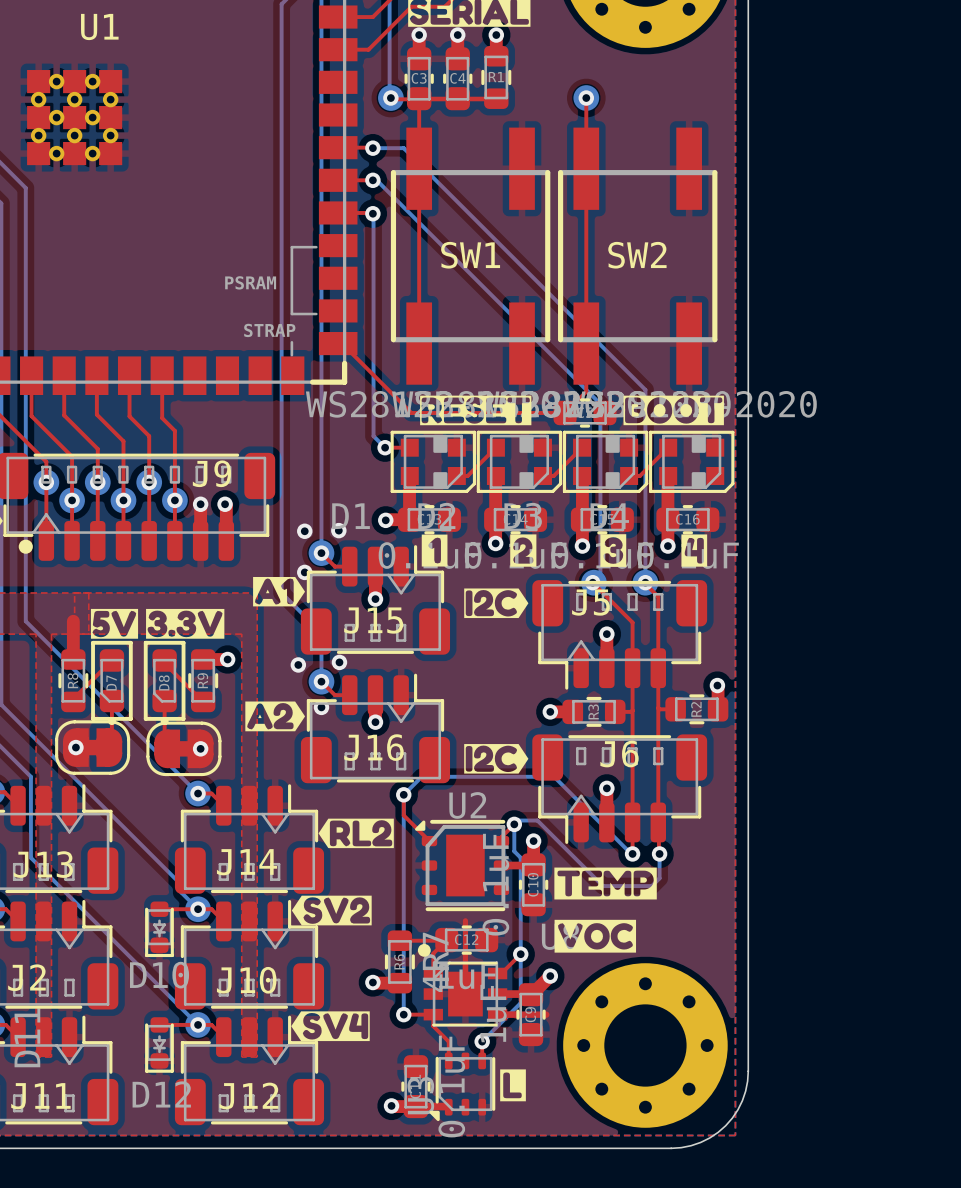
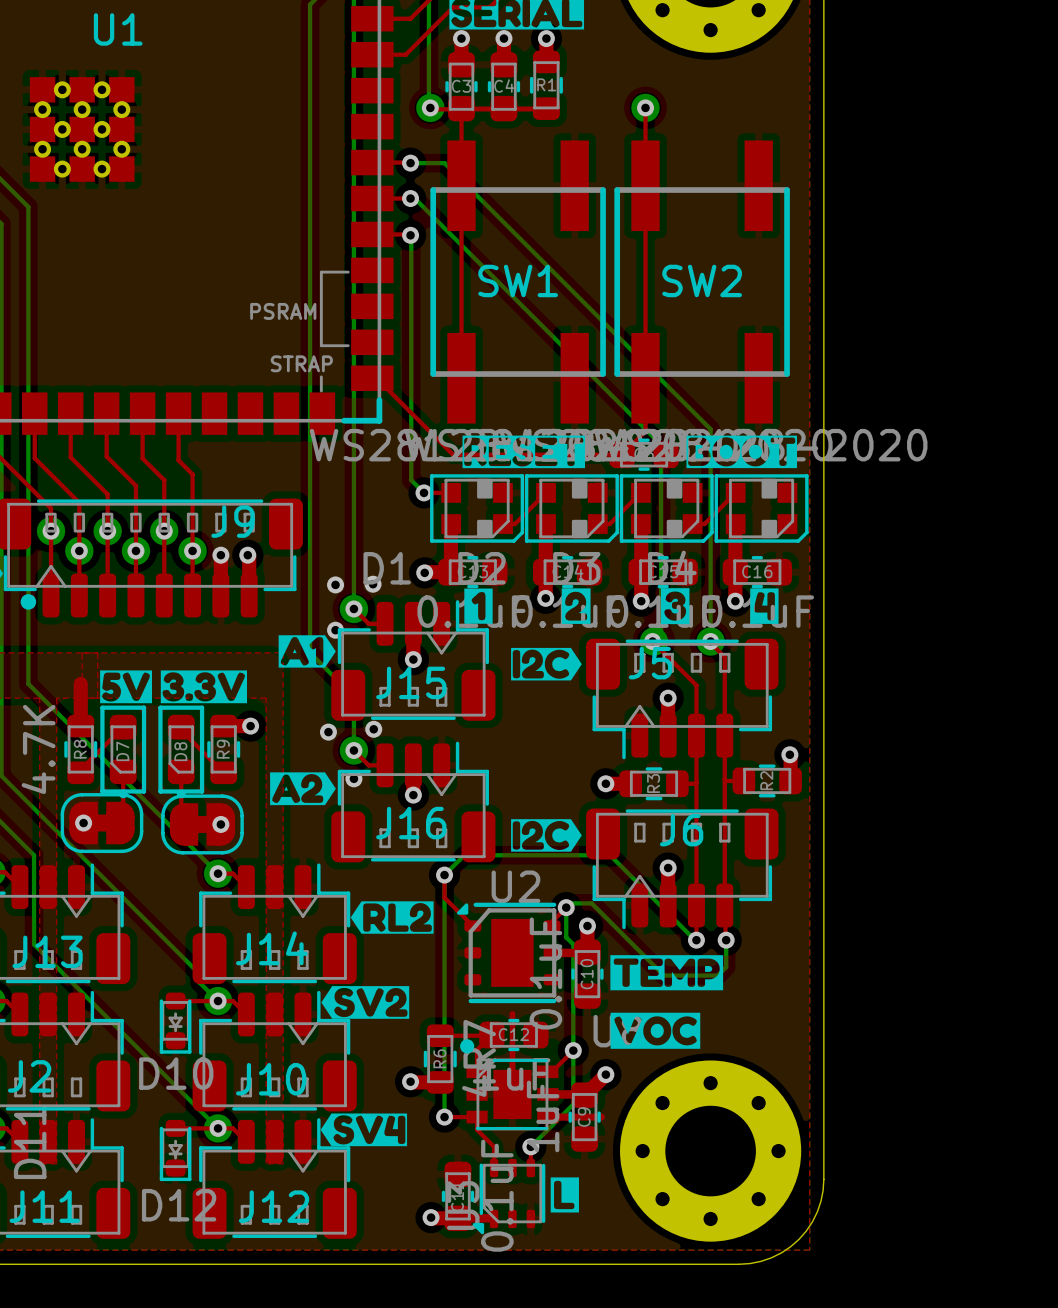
R8 value: none -> 4.7K (38, 749)

